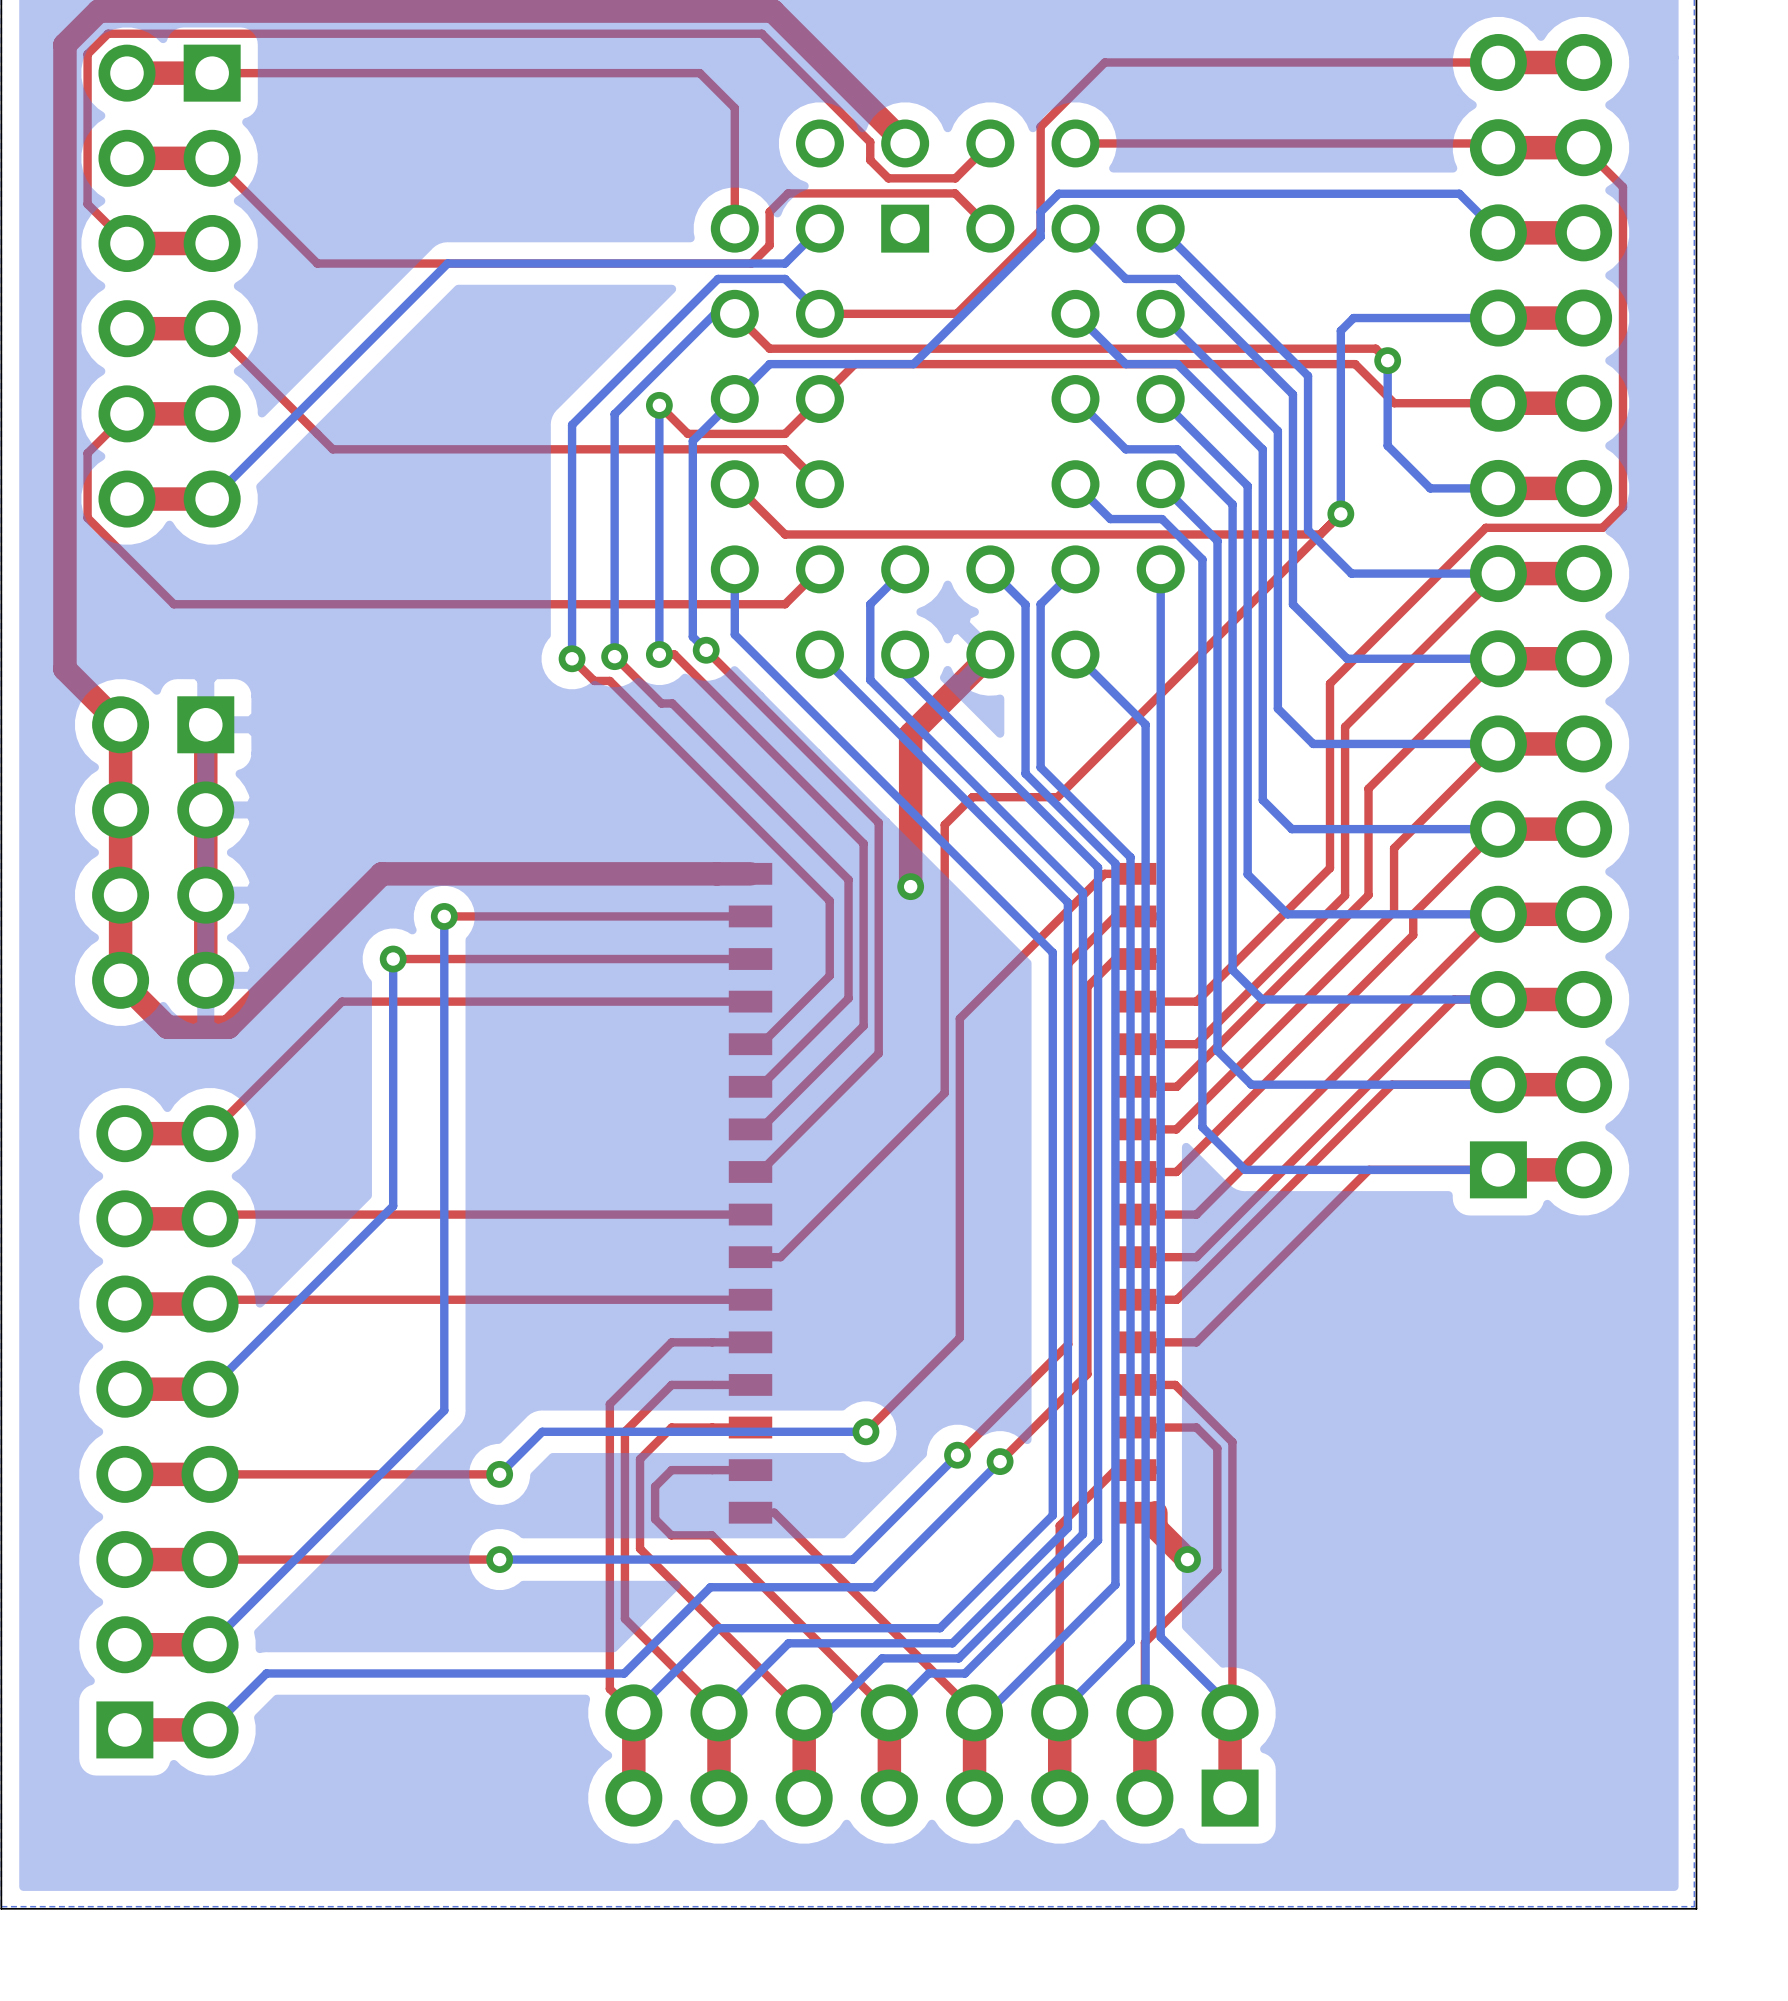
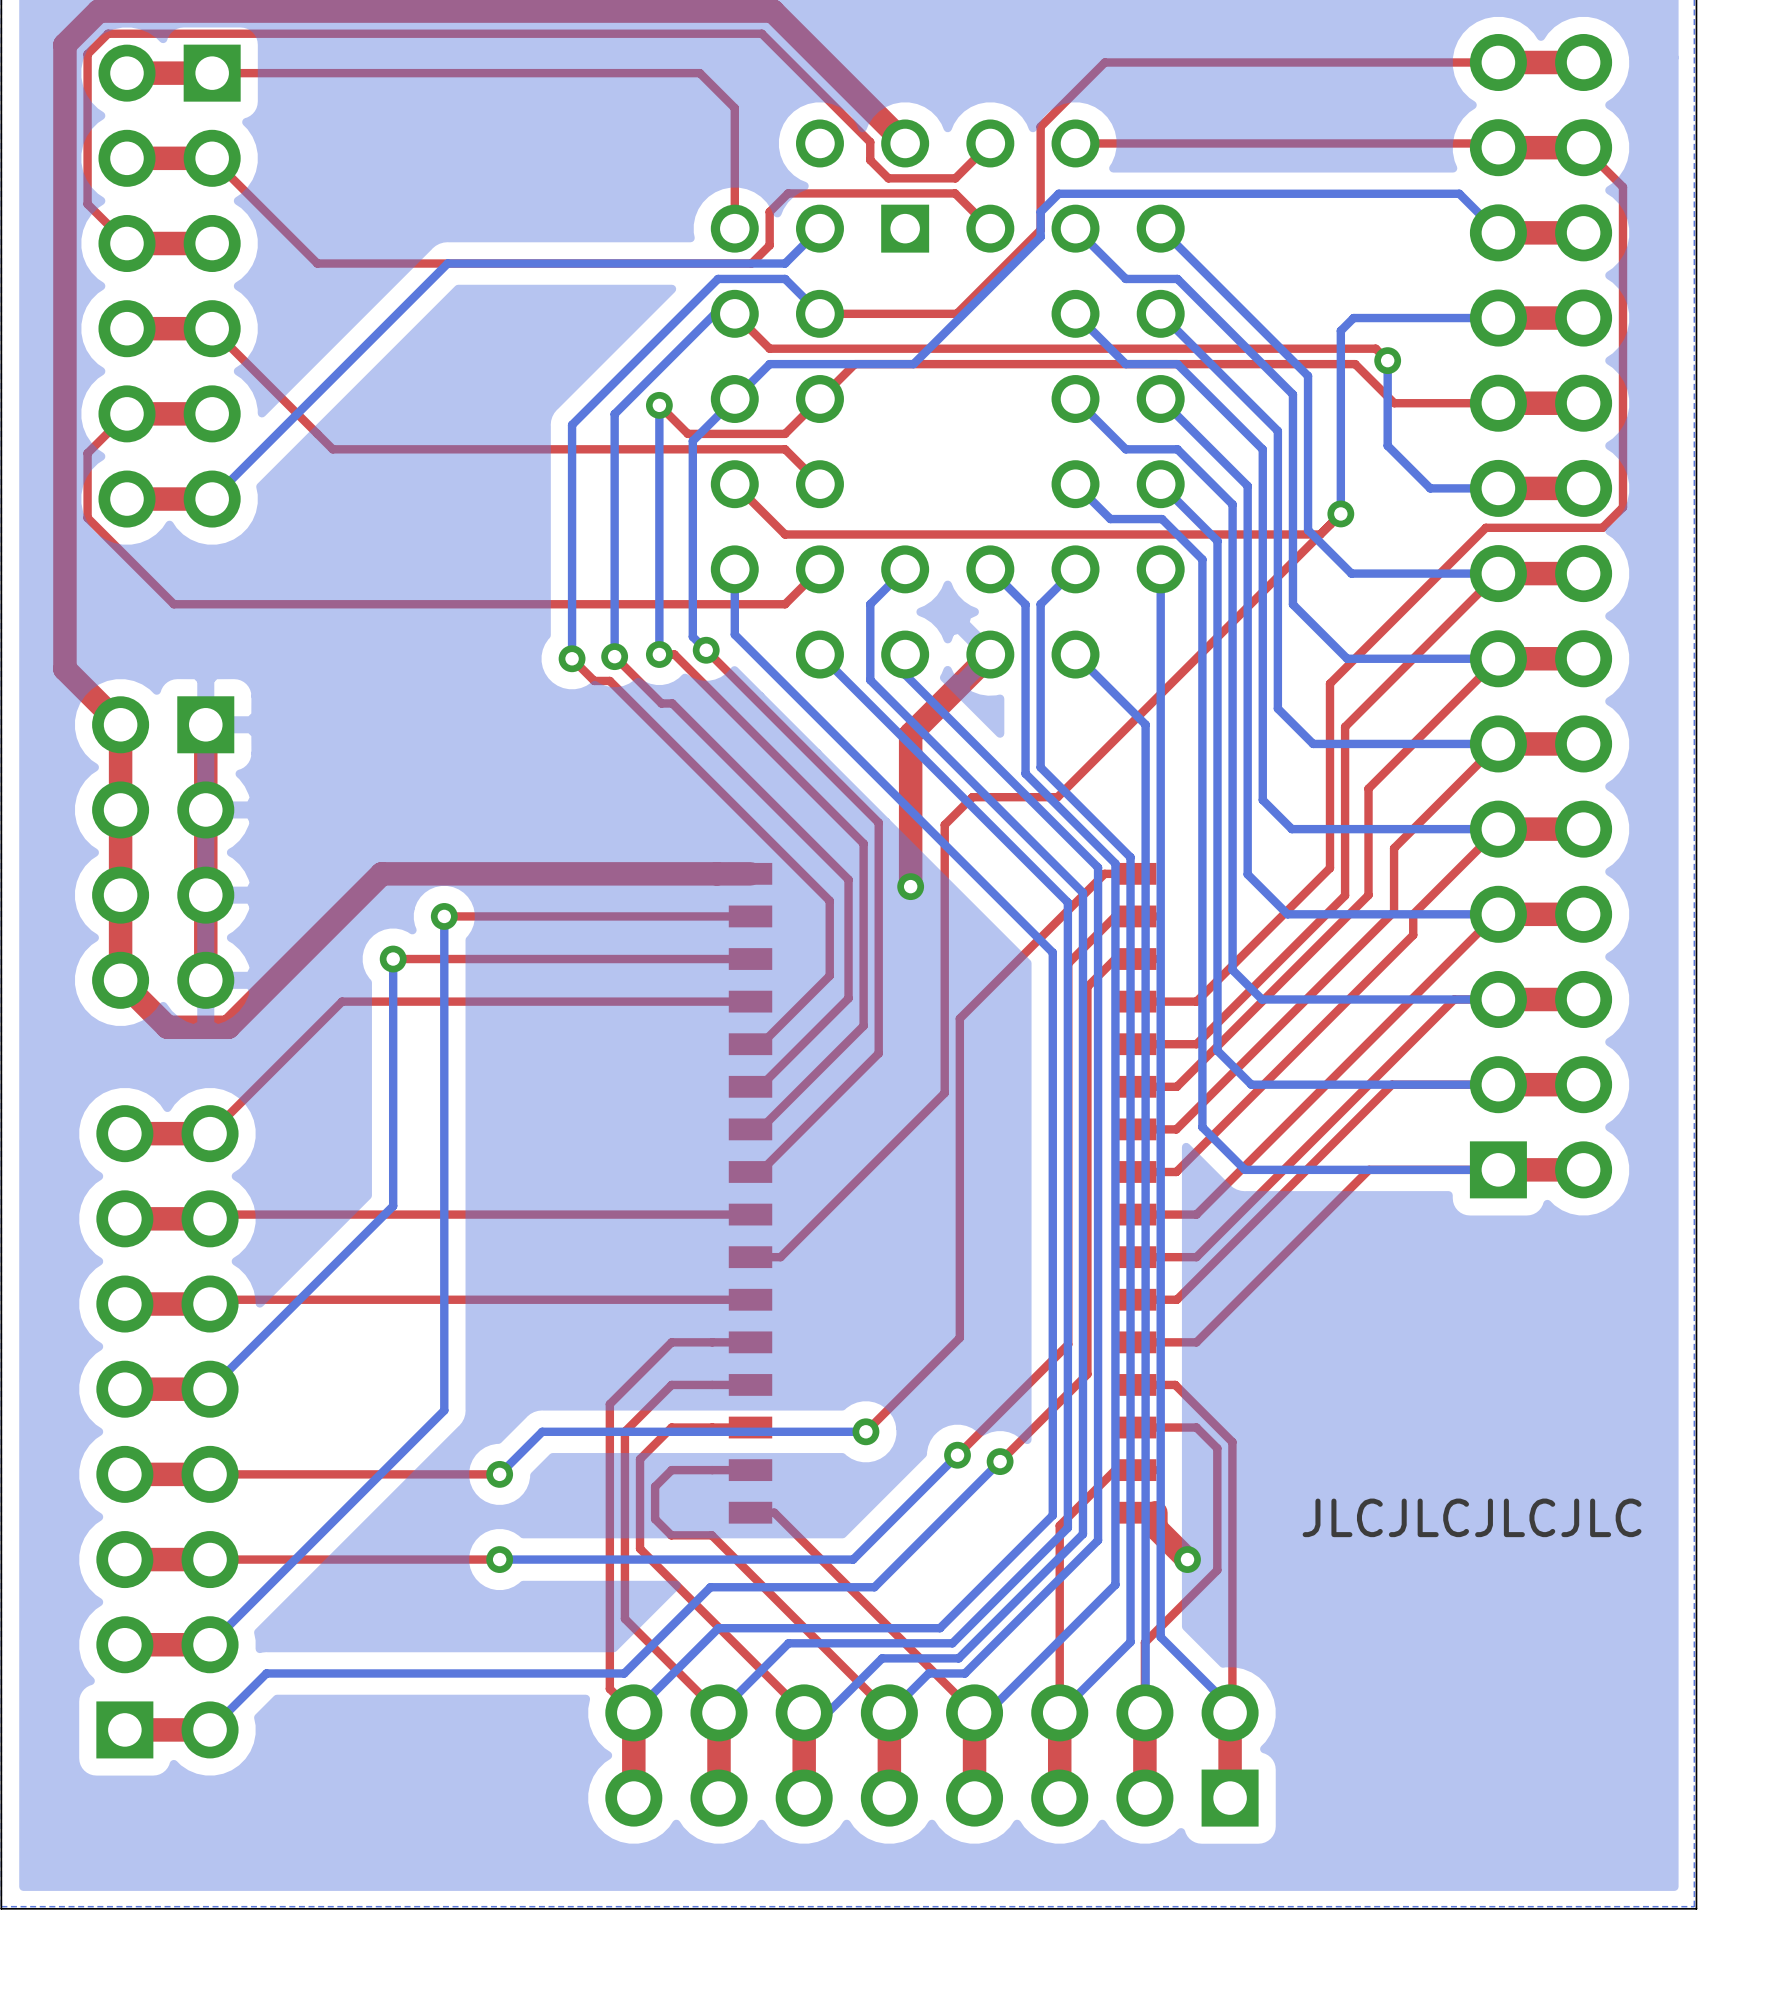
text: none -> JLCJLCJLCJLC (1472, 1517)

